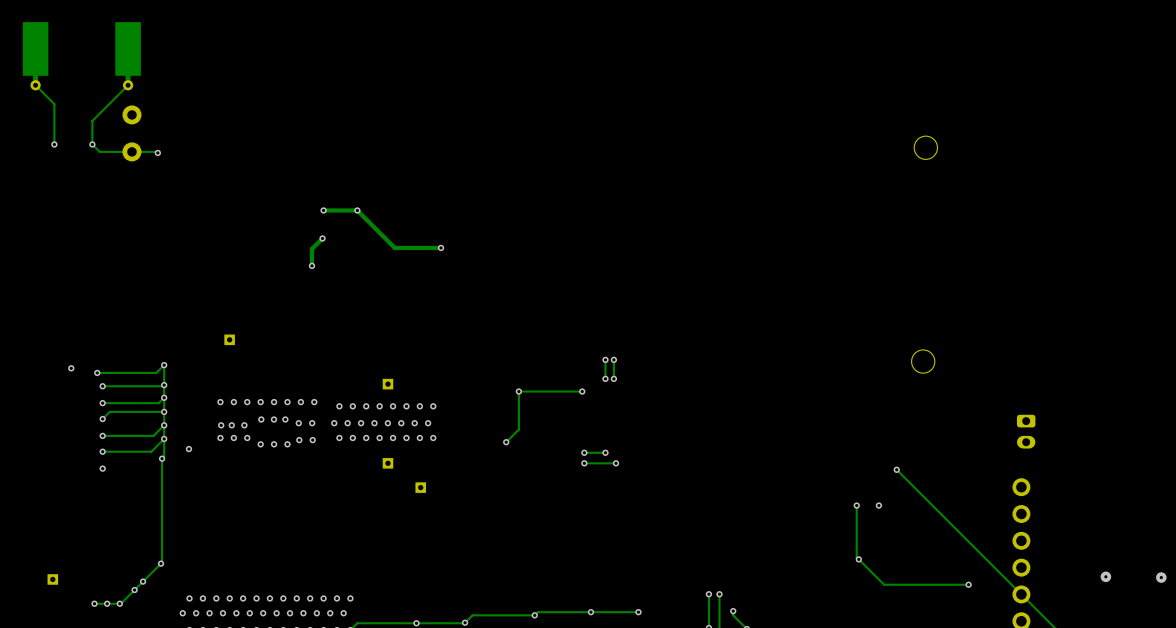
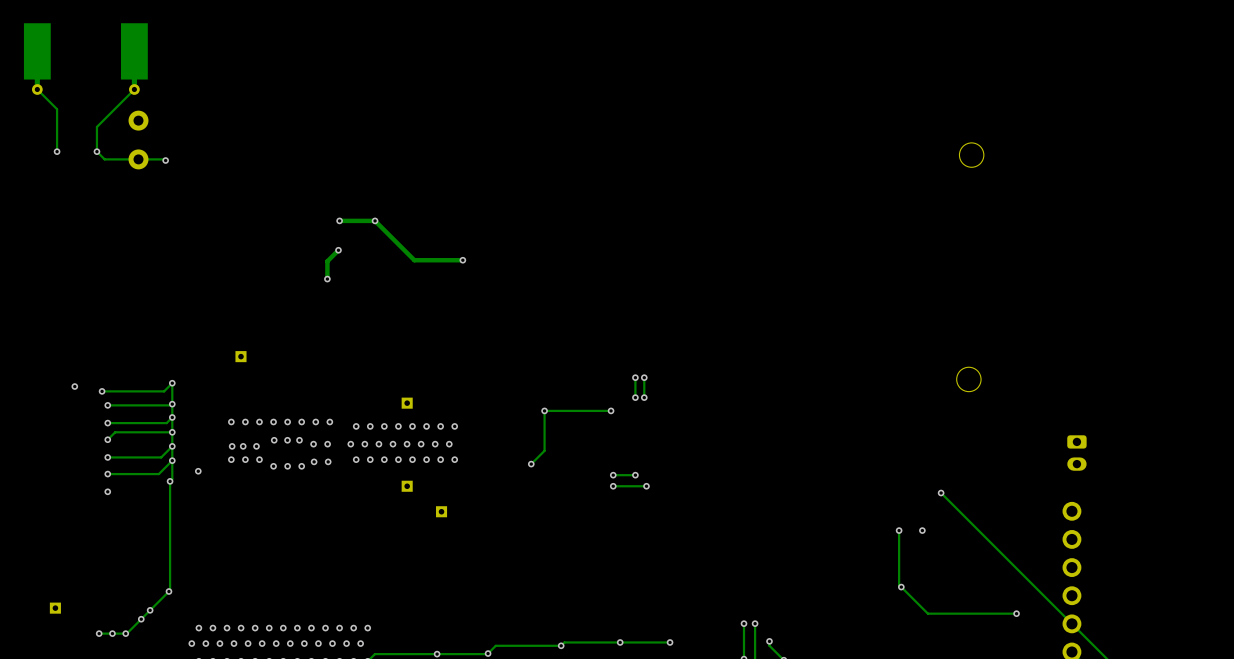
via: (1105, 576) -> none
via: (1161, 577) -> none

